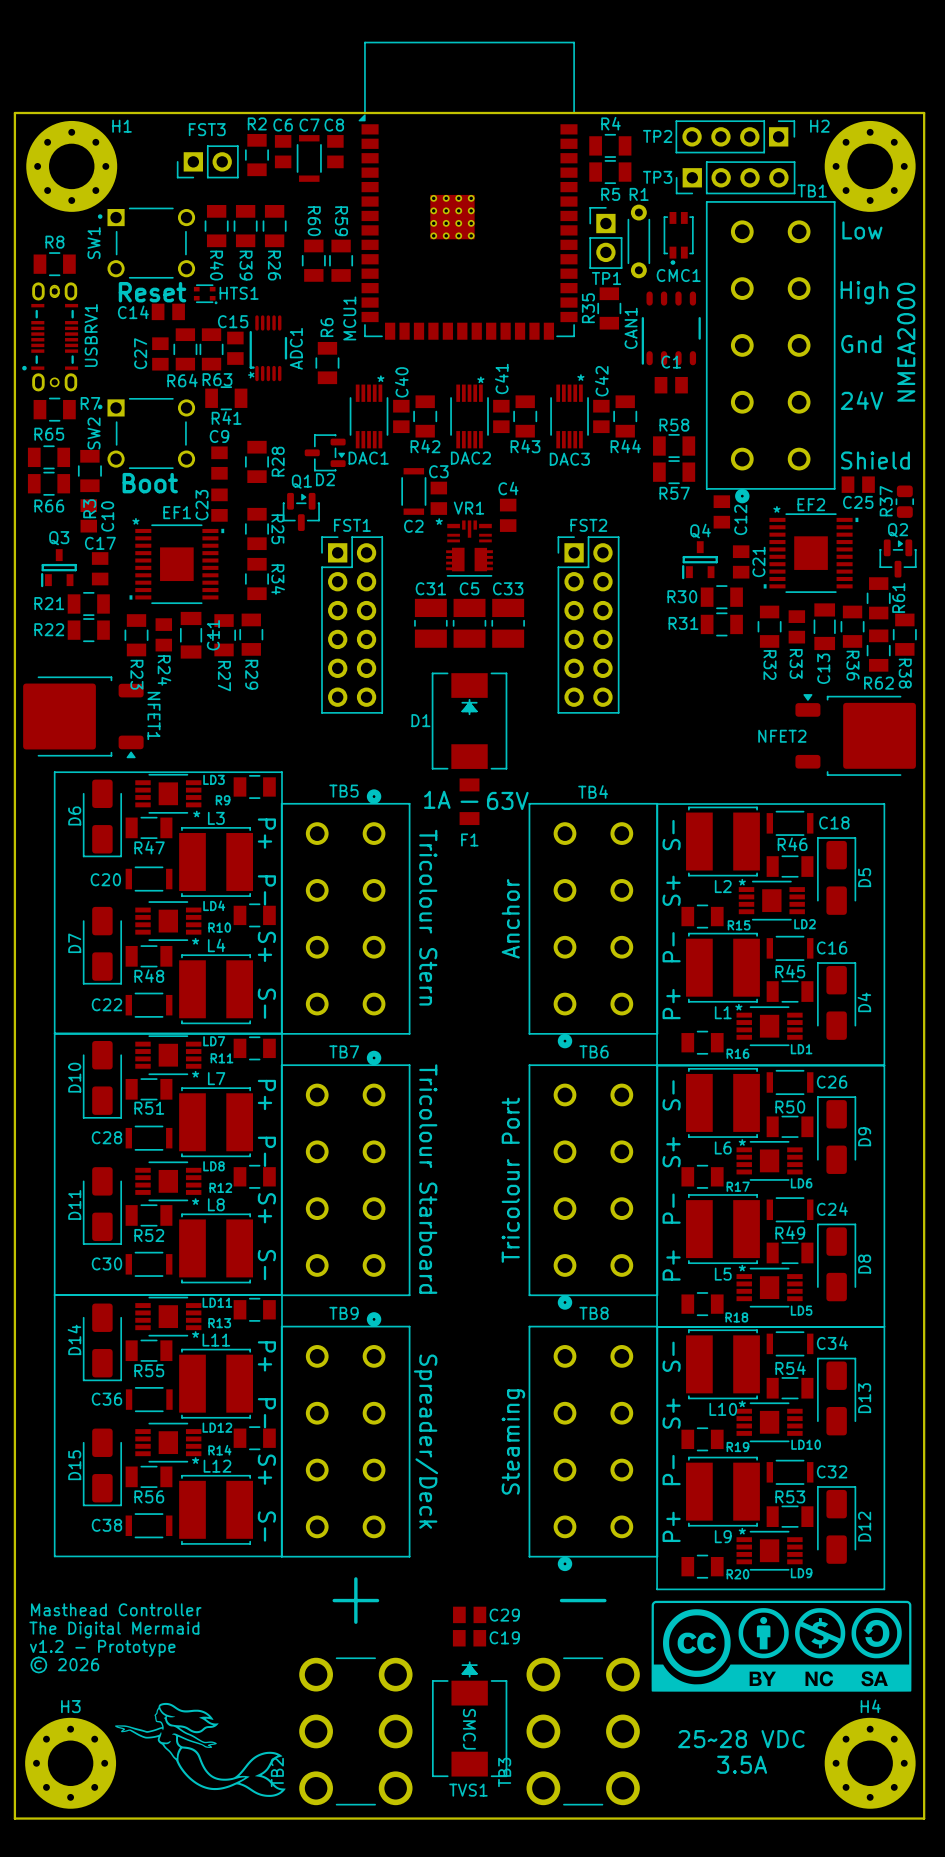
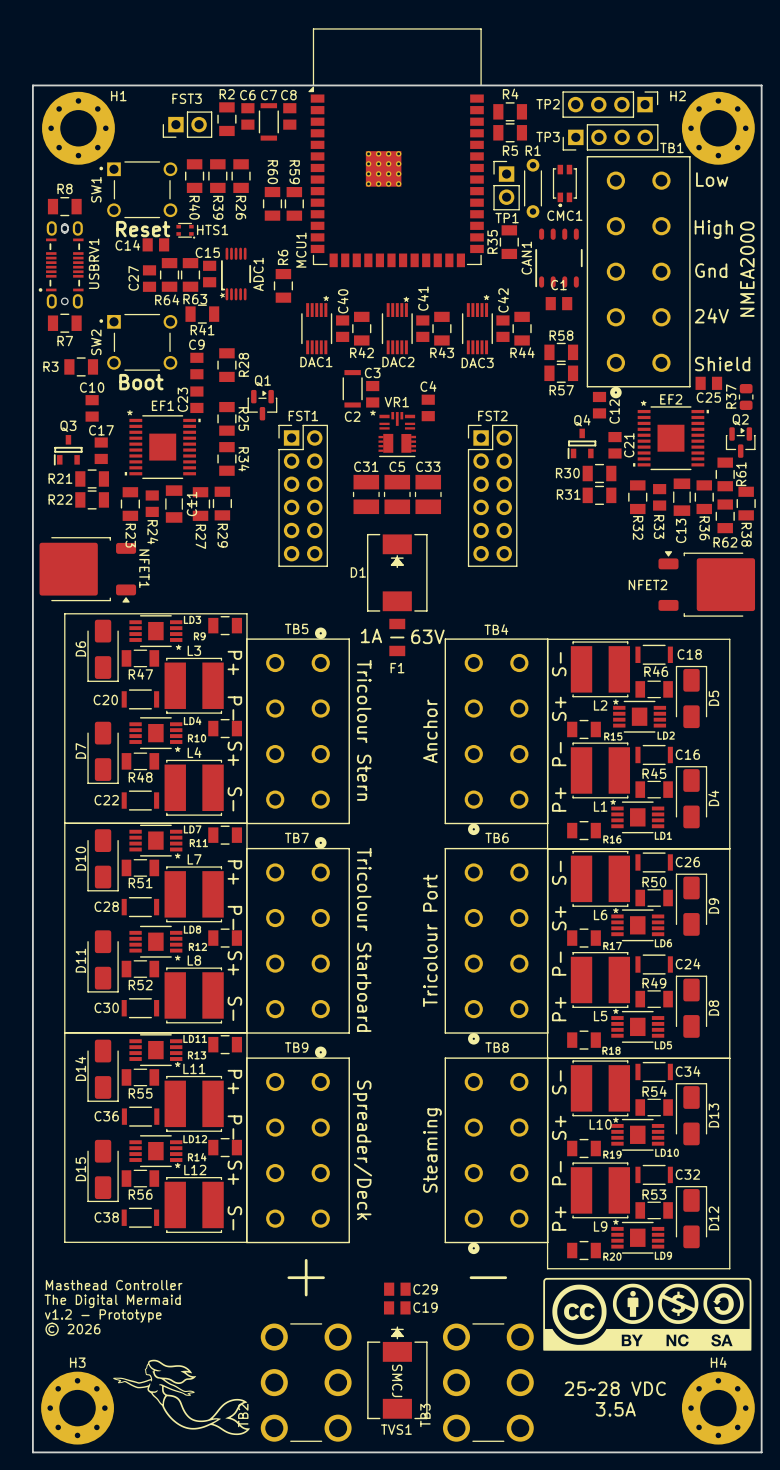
R7 name position: R7 (90, 403) -> R7 (65, 341)
D2: (325, 452) -> none
R65: (49, 457) -> none
R3 rotation: 0° (89, 471) -> 90° clockwise (81, 366)
R66: (49, 483) -> none
C10 name rotation: 0° (107, 516) -> 90° clockwise (92, 387)

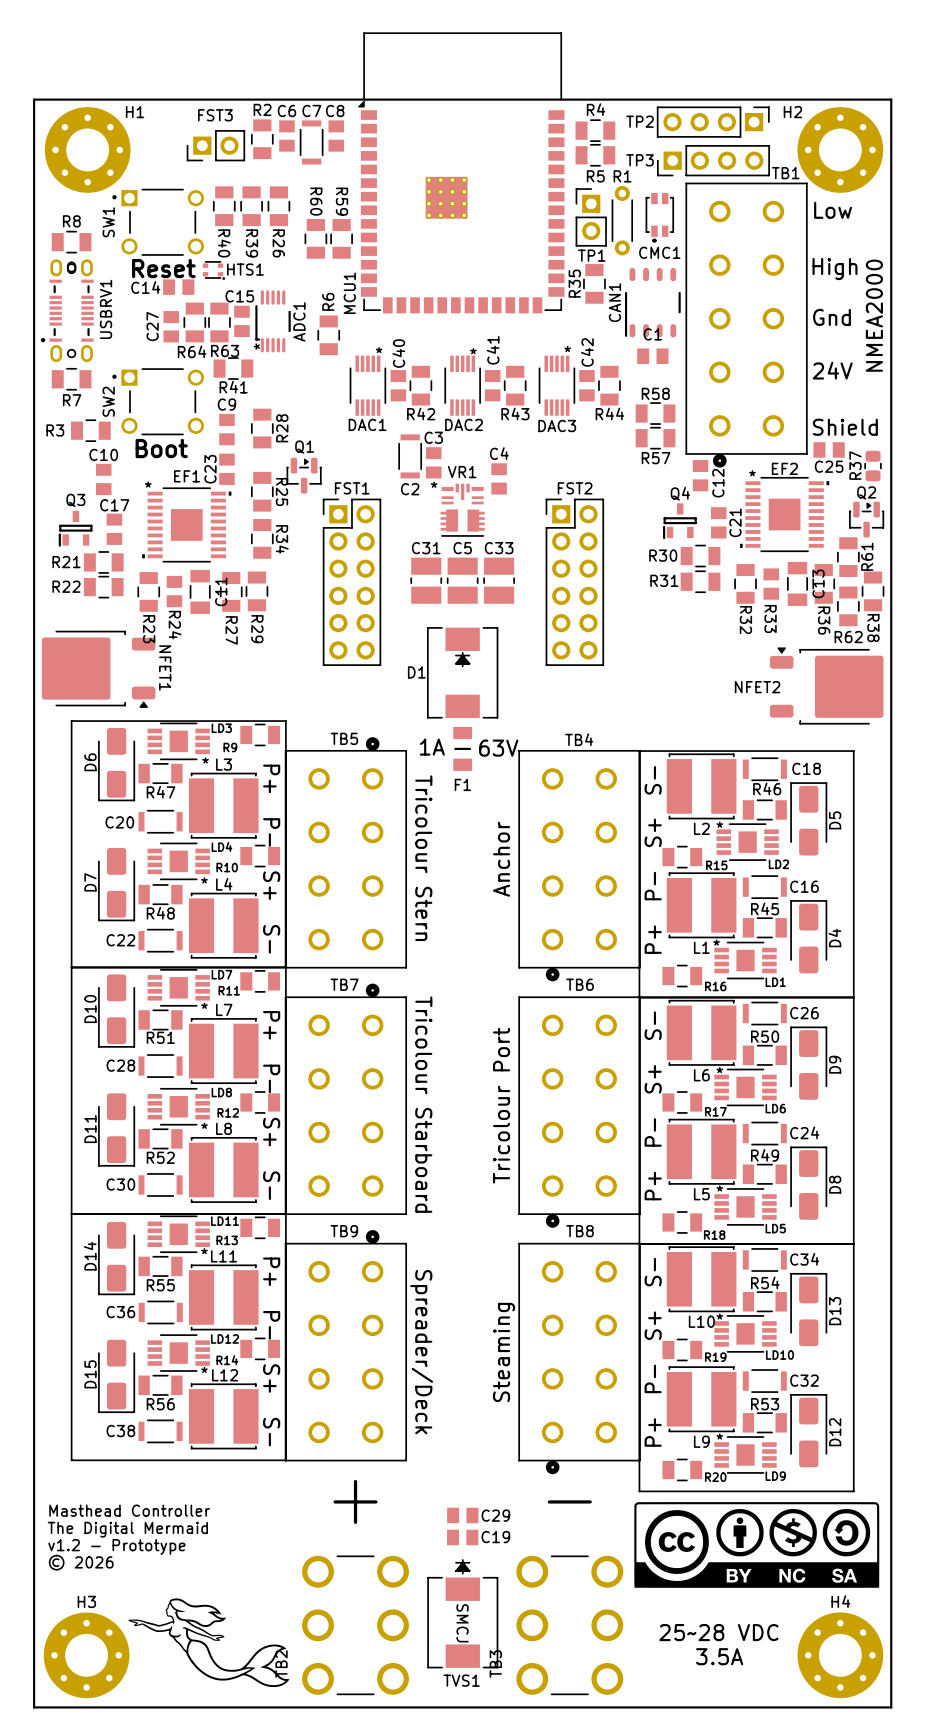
C13 name position: C13 (681, 530) -> C13 (818, 583)

